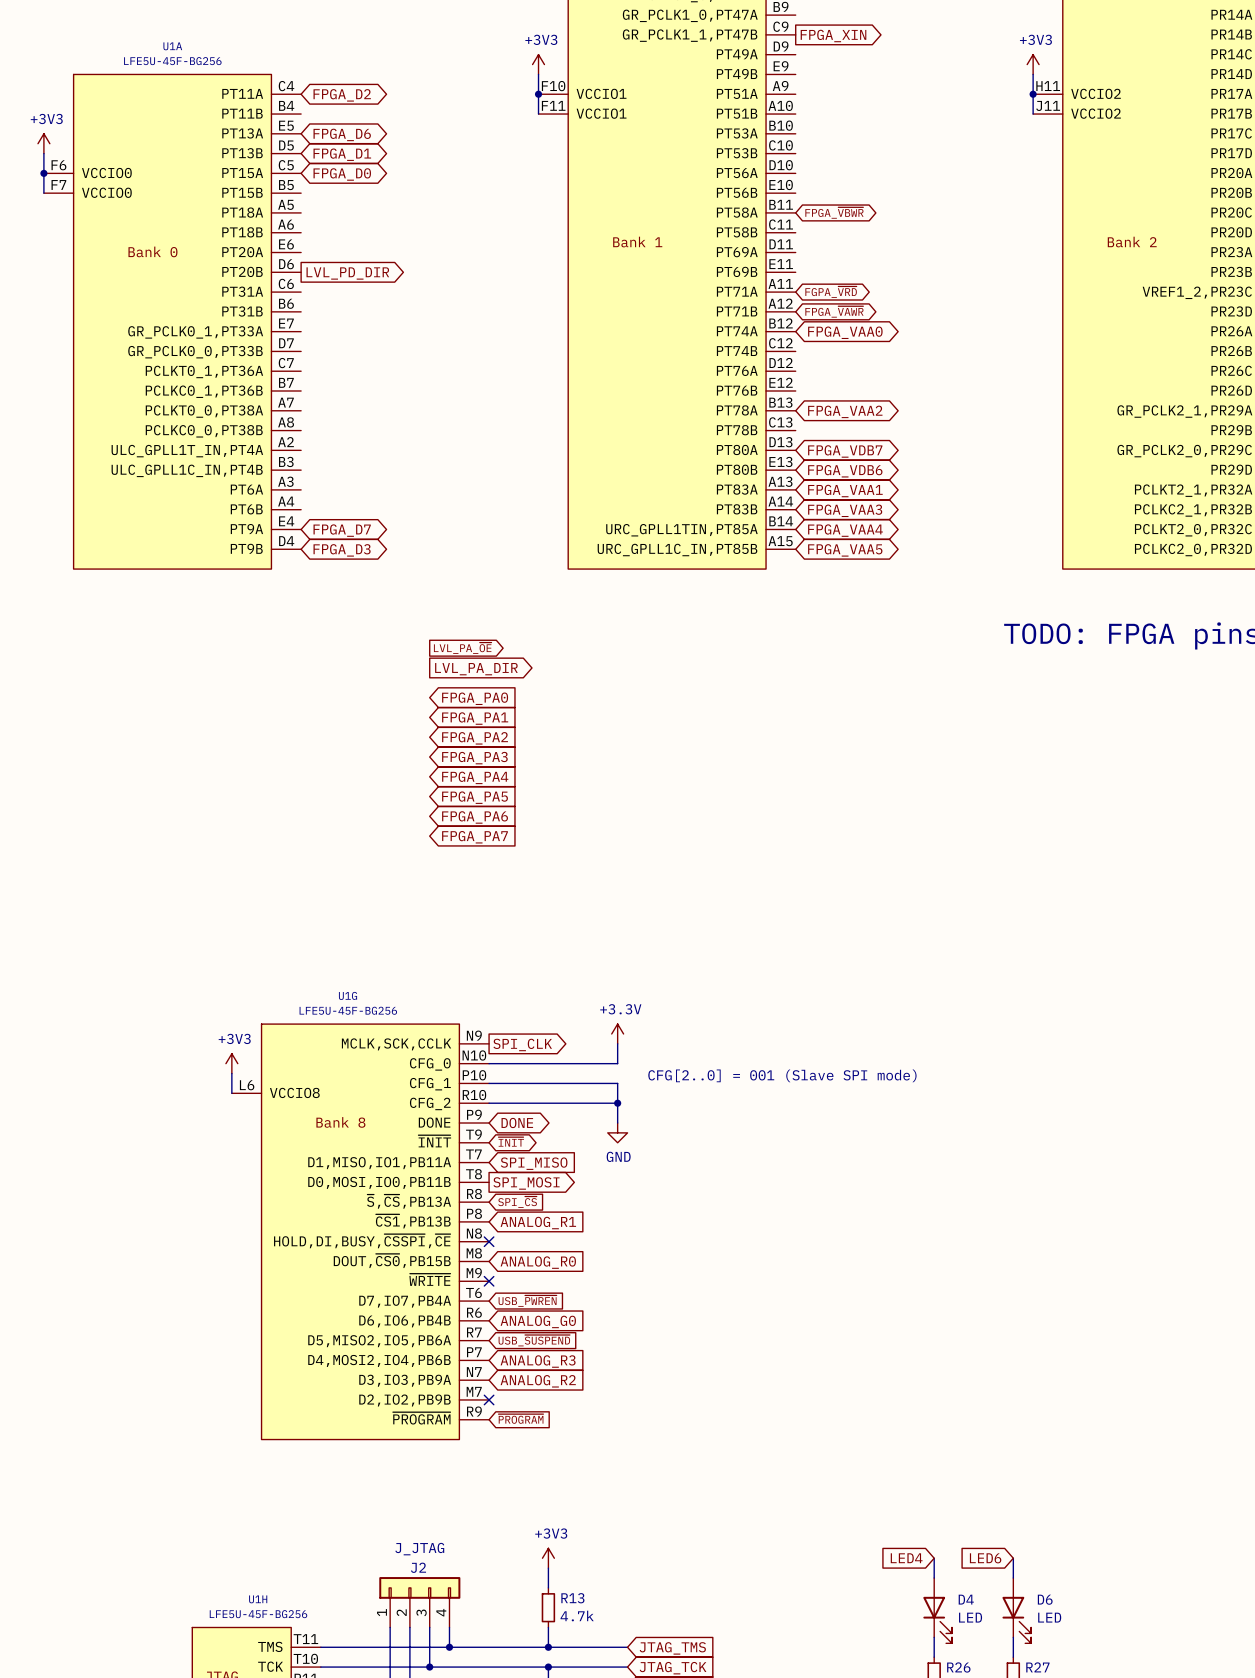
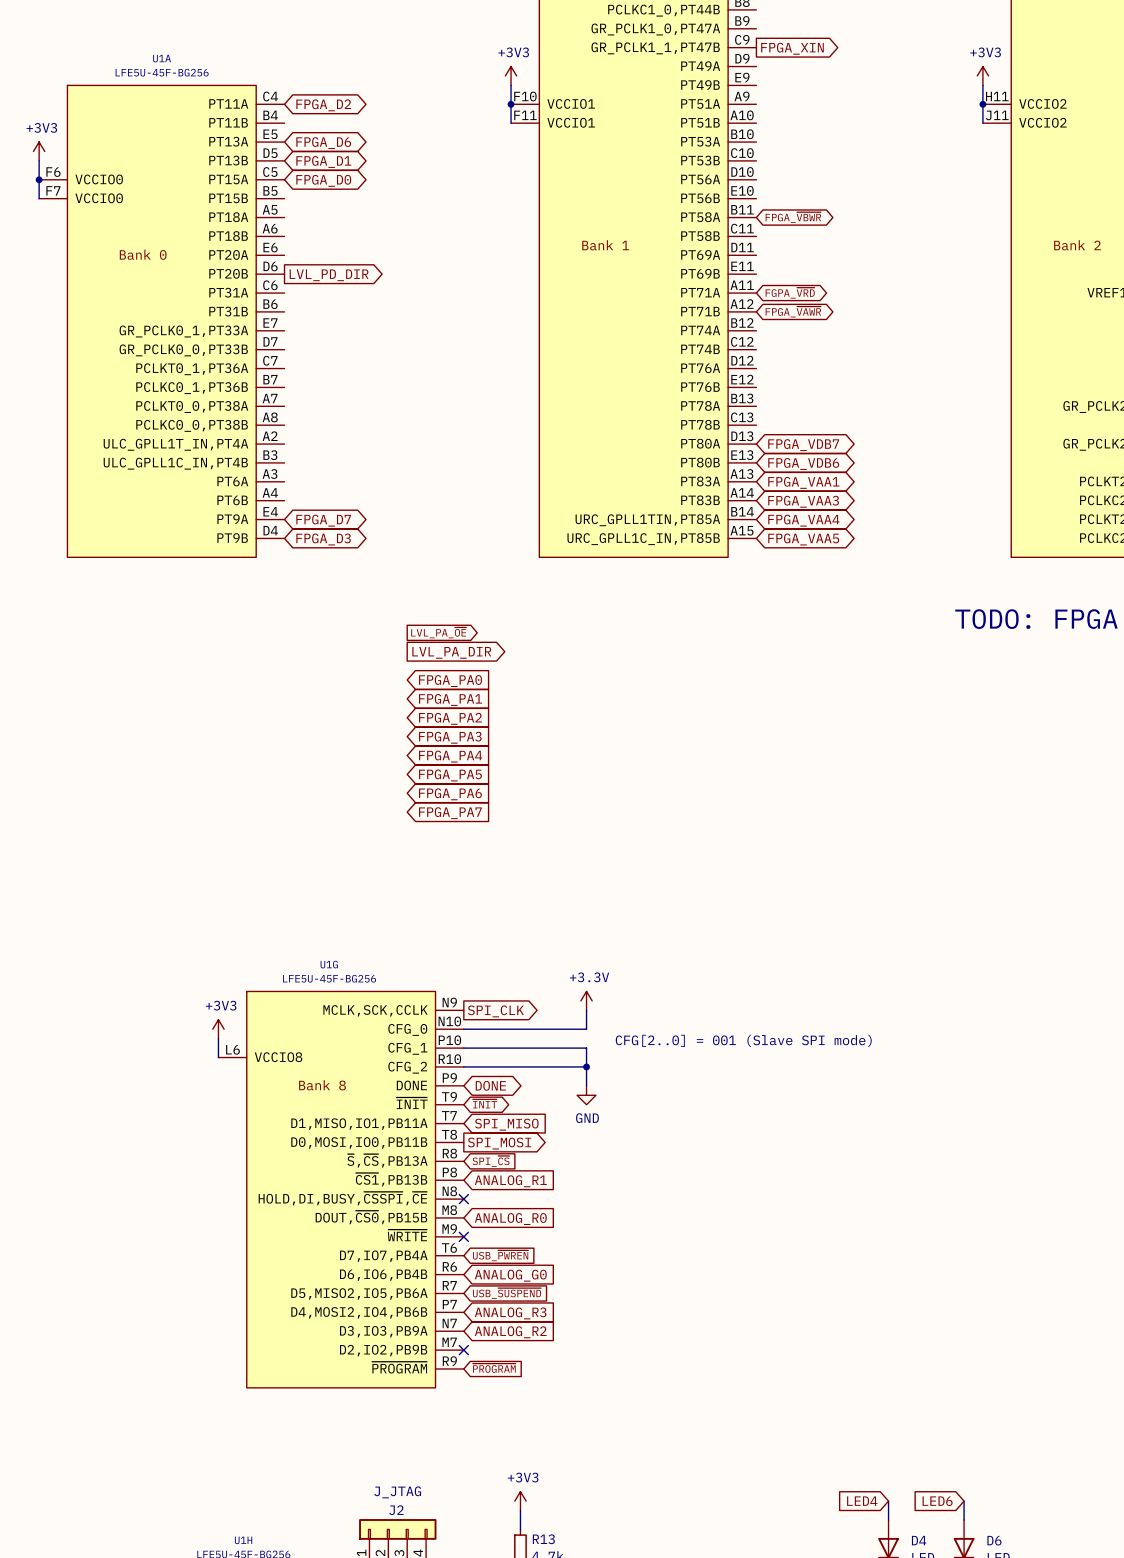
global label: FPGA_VAA0 (845, 332) -> none
global label: FPGA_VAA2 (845, 411) -> none

